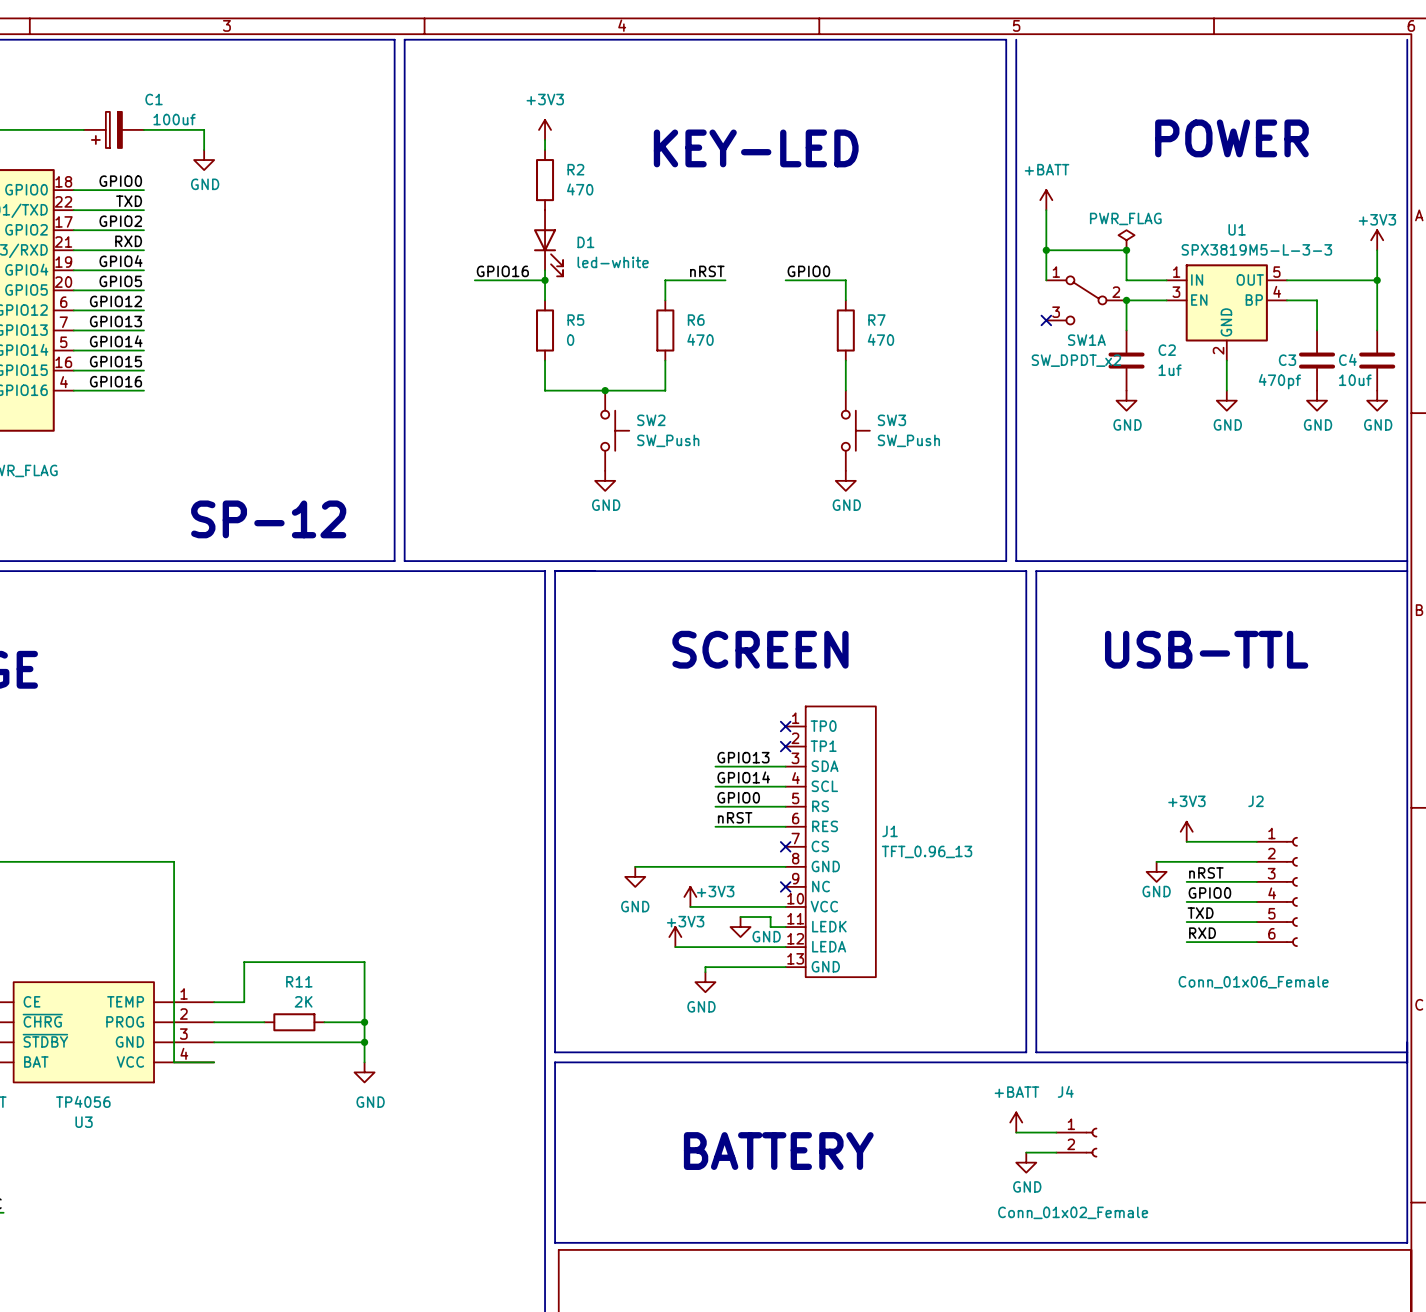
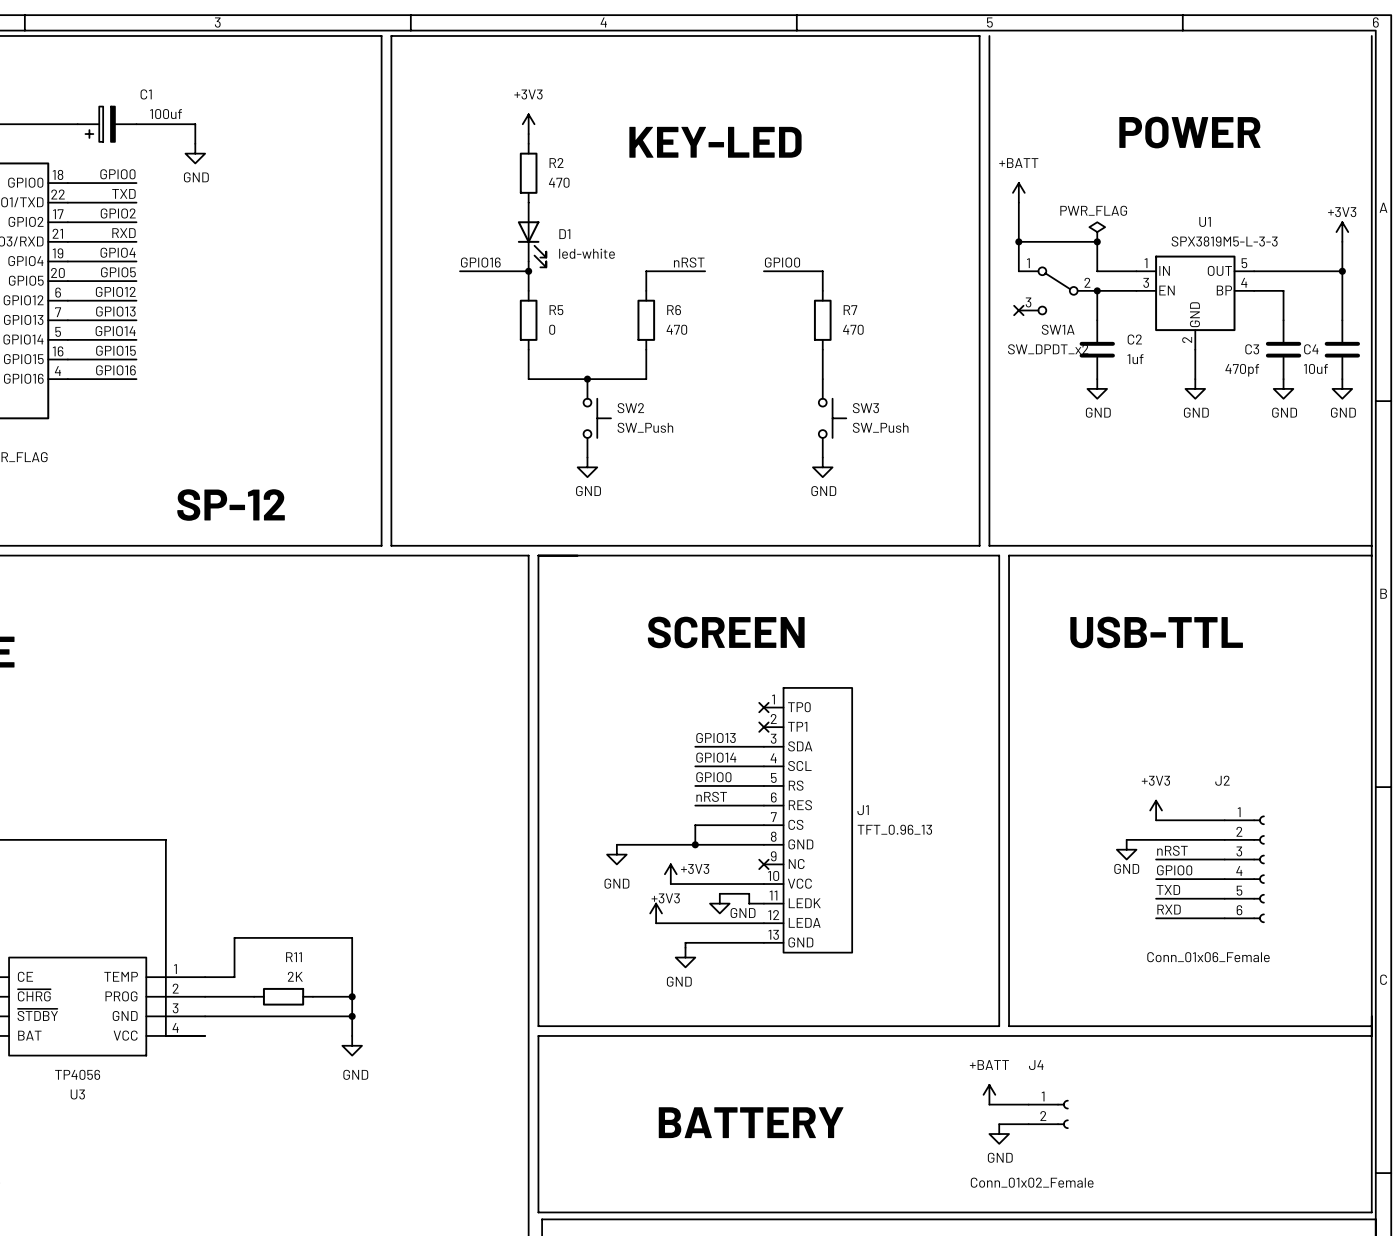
wire: none -> (763, 825) (695, 825) (695, 844)
no-connect mark: (785, 846) -> none
junction: none -> (695, 844)

